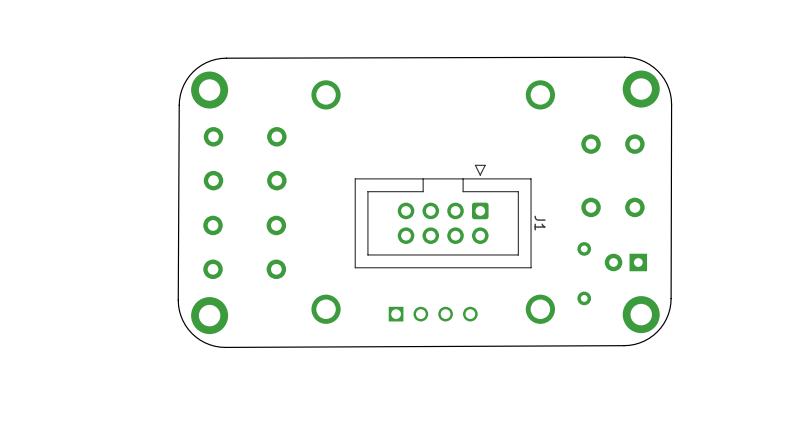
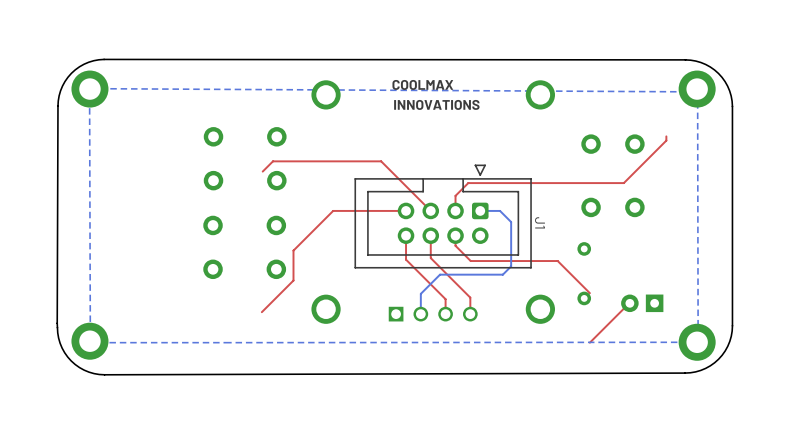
board edge: (624, 57) (226, 58) (215, 59) (201, 65) (186, 80) (179, 100) (178, 300) (179, 310) (185, 325) (196, 337) (204, 342) (225, 347) (623, 345) (639, 343) (649, 338) (663, 323) (670, 303) (671, 99) (666, 83) (657, 71) (644, 61) (624, 57) -> (104, 59) (685, 59) (705, 64) (722, 77) (729, 90) (732, 101) (732, 325) (727, 346) (718, 359) (710, 365) (695, 371) (685, 373) (104, 374) (84, 370) (67, 357) (62, 348) (57, 332) (58, 100) (62, 86) (71, 73) (84, 64) (104, 59)
drawing: none -> [392, 79, 480, 110]
bottom zone outline: none -> (89, 88) (90, 342) (698, 342) (697, 91) (89, 88)
part position: (641, 89) -> (697, 89)
part position: (209, 90) -> (89, 89)
top track: none -> (666, 136) (666, 140) (623, 183) (468, 183) (455, 195) (455, 210)
top track: none -> (262, 171) (272, 161) (381, 161) (430, 210)
top track: none -> (406, 210) (333, 210) (293, 250) (293, 280) (261, 312)
bottom track: none -> (480, 210) (500, 210) (511, 222) (511, 266) (502, 274) (440, 274) (420, 293) (420, 314)
top track: none -> (406, 235) (406, 259) (445, 299) (445, 314)
top track: none -> (430, 235) (430, 258) (470, 297) (470, 314)
top track: none -> (455, 235) (455, 245) (470, 261) (557, 261) (589, 293)
part position: (625, 262) -> (642, 303)
top track: none -> (627, 304) (589, 342)
part position: (641, 314) -> (697, 342)
part position: (209, 315) -> (89, 341)

